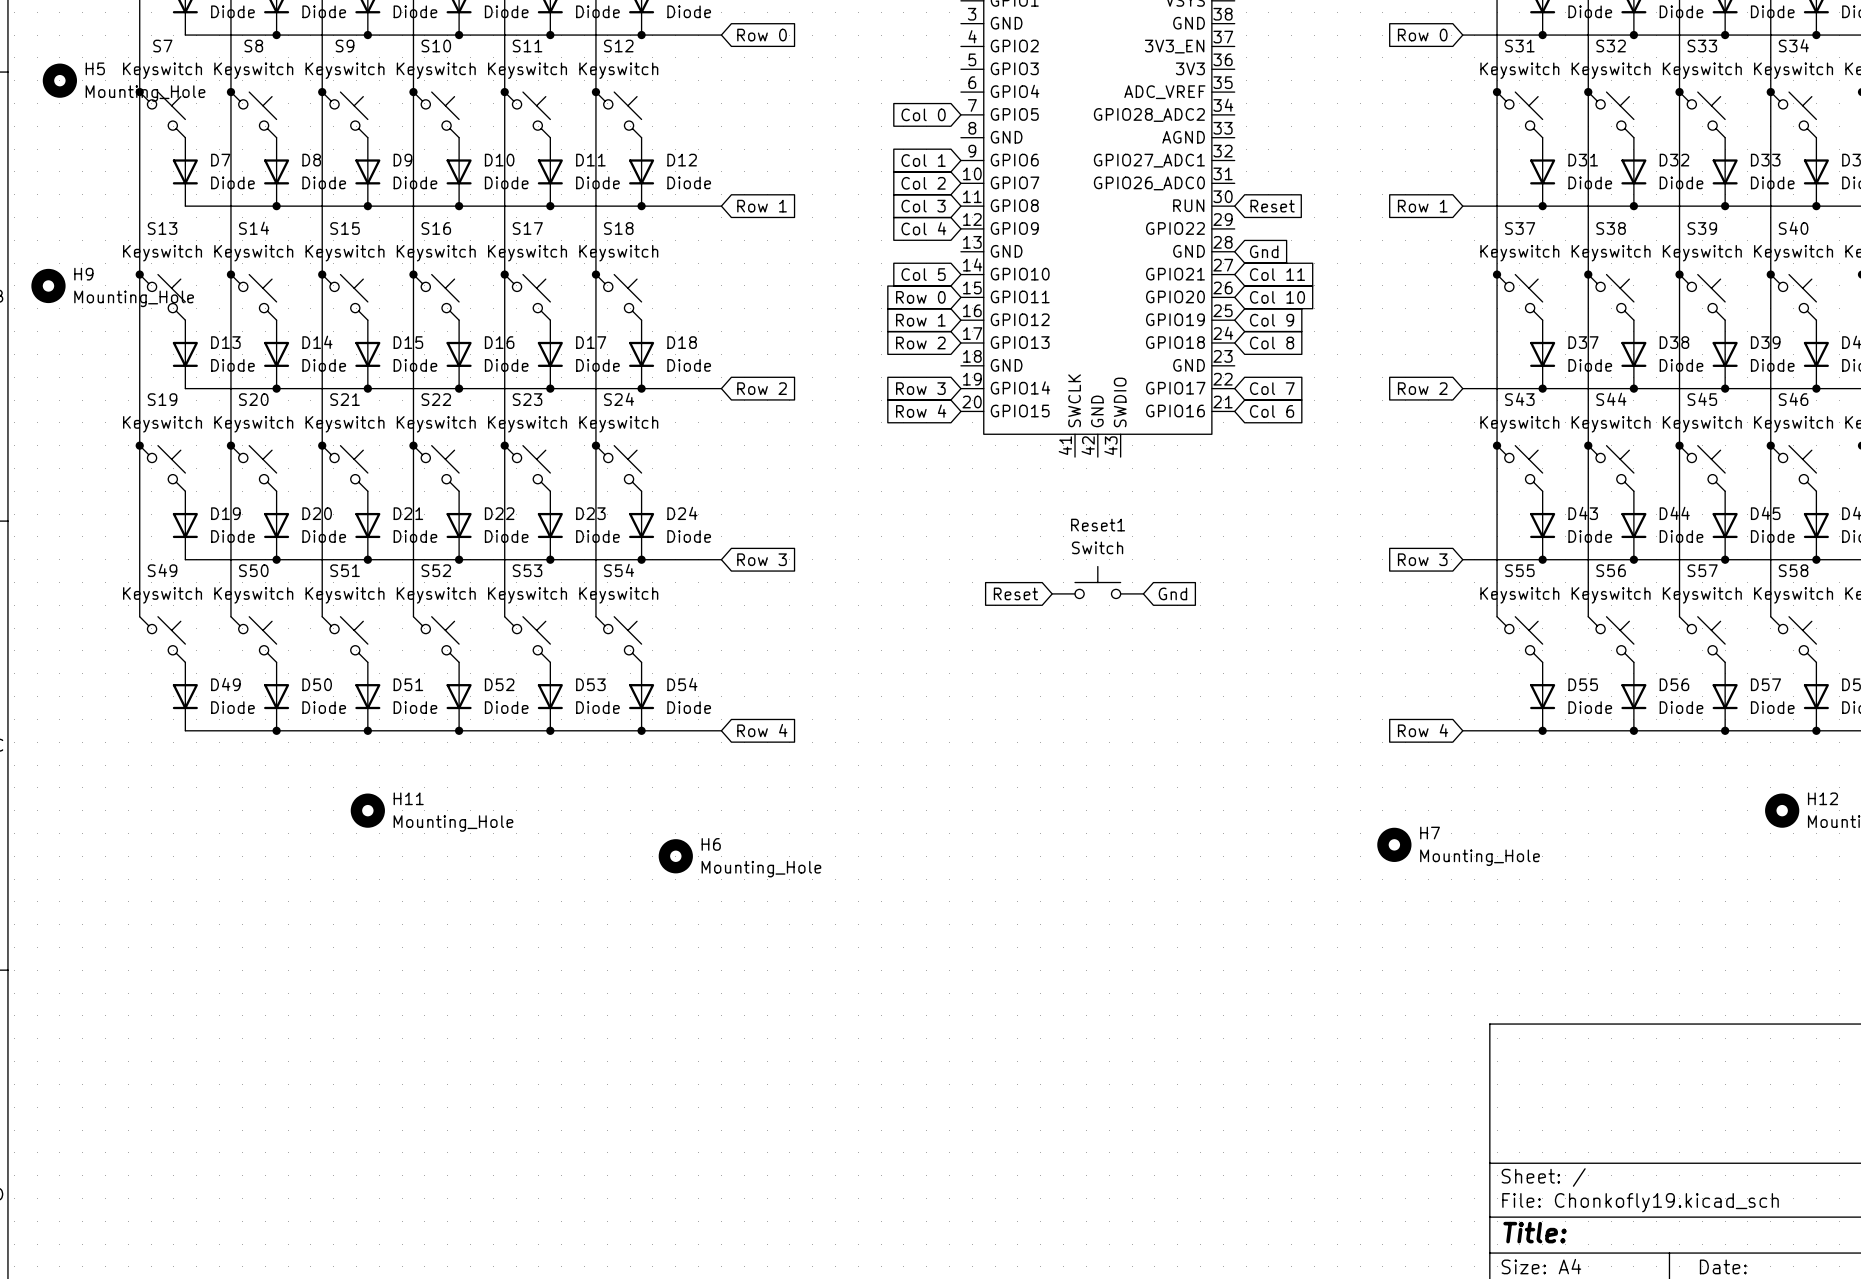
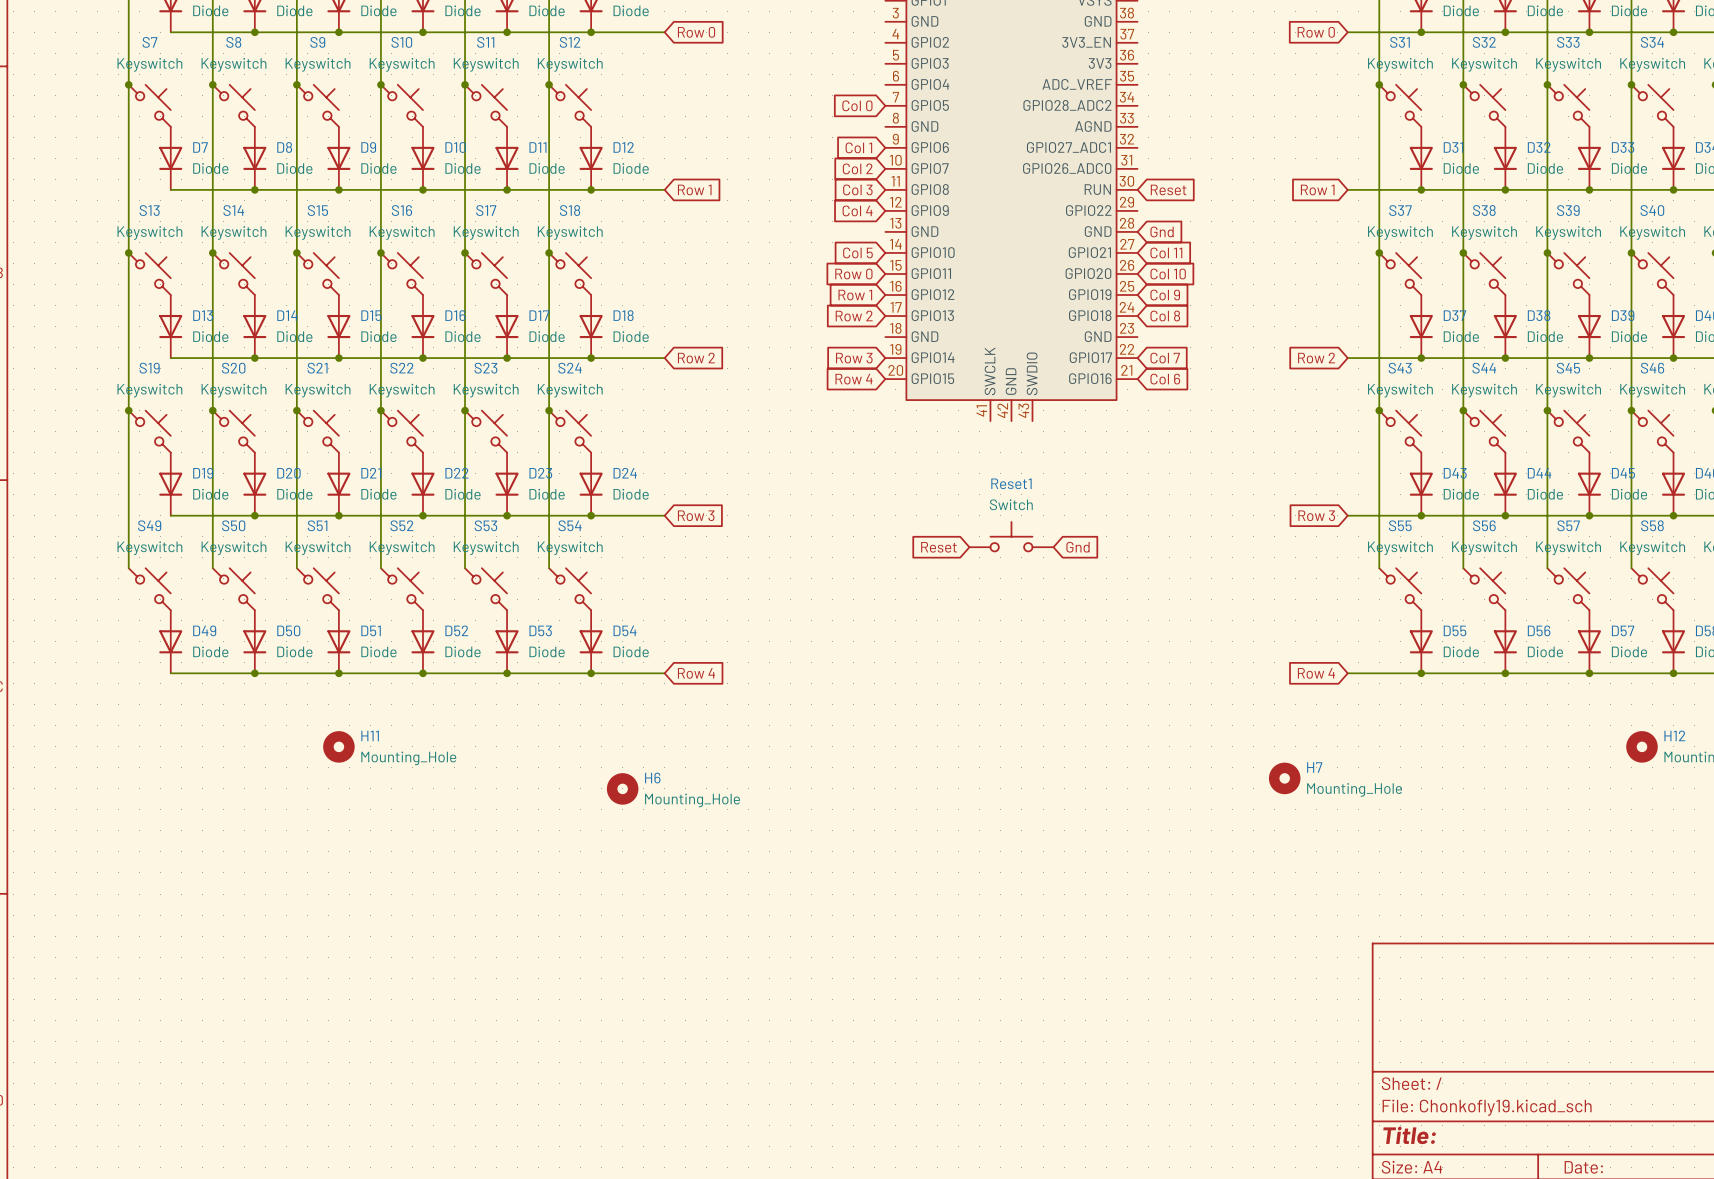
H5: Mounting_Hole (59, 80) -> none
H9: Mounting_Hole (48, 285) -> none

